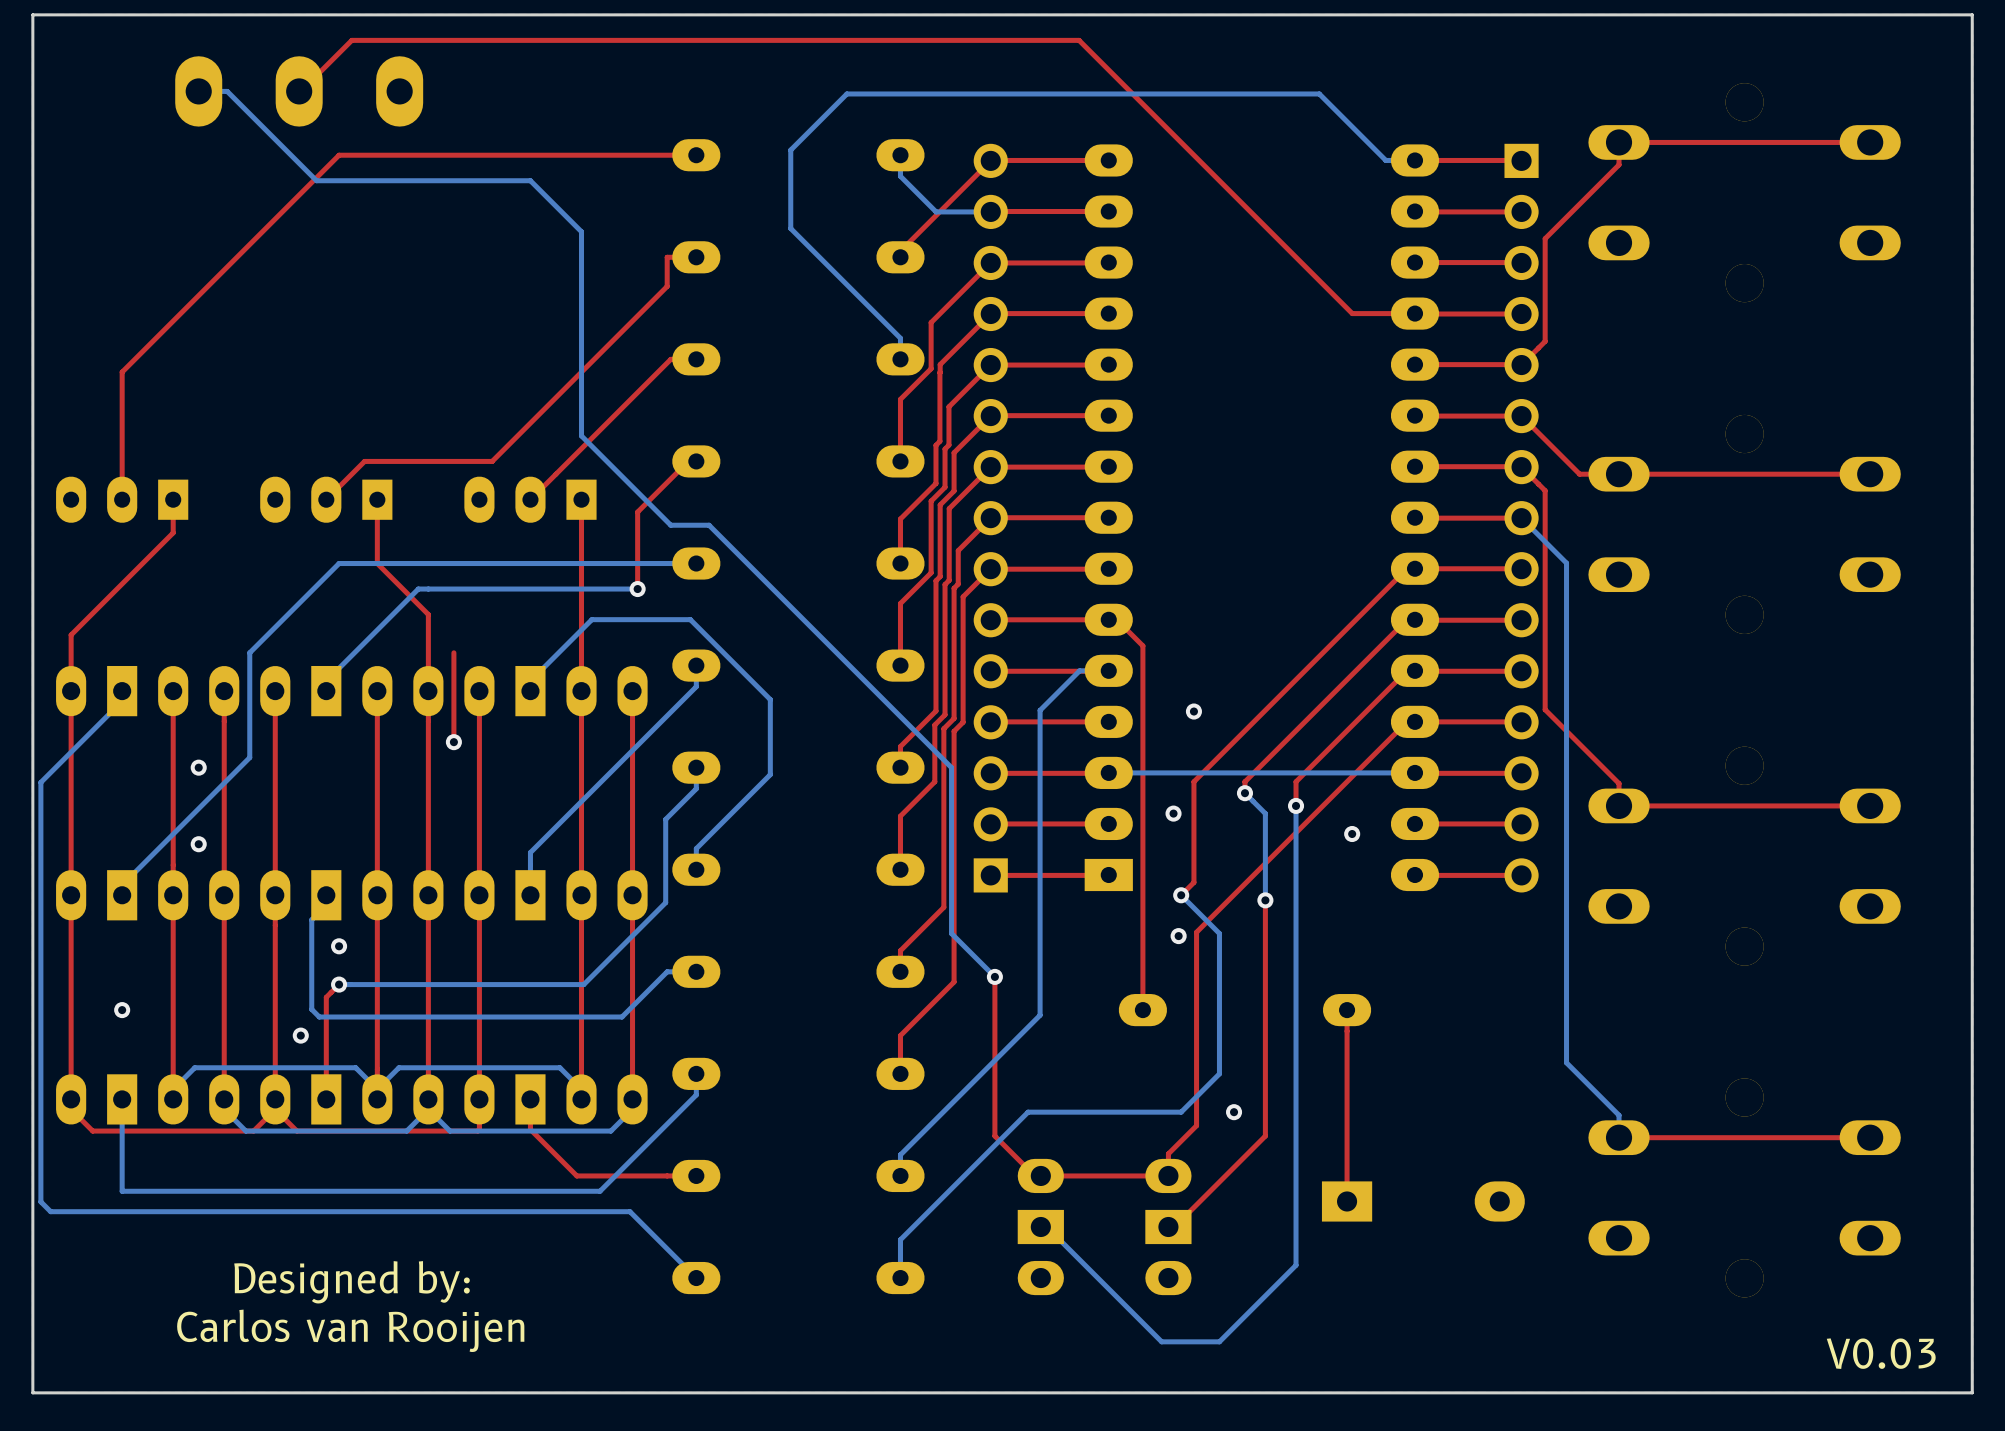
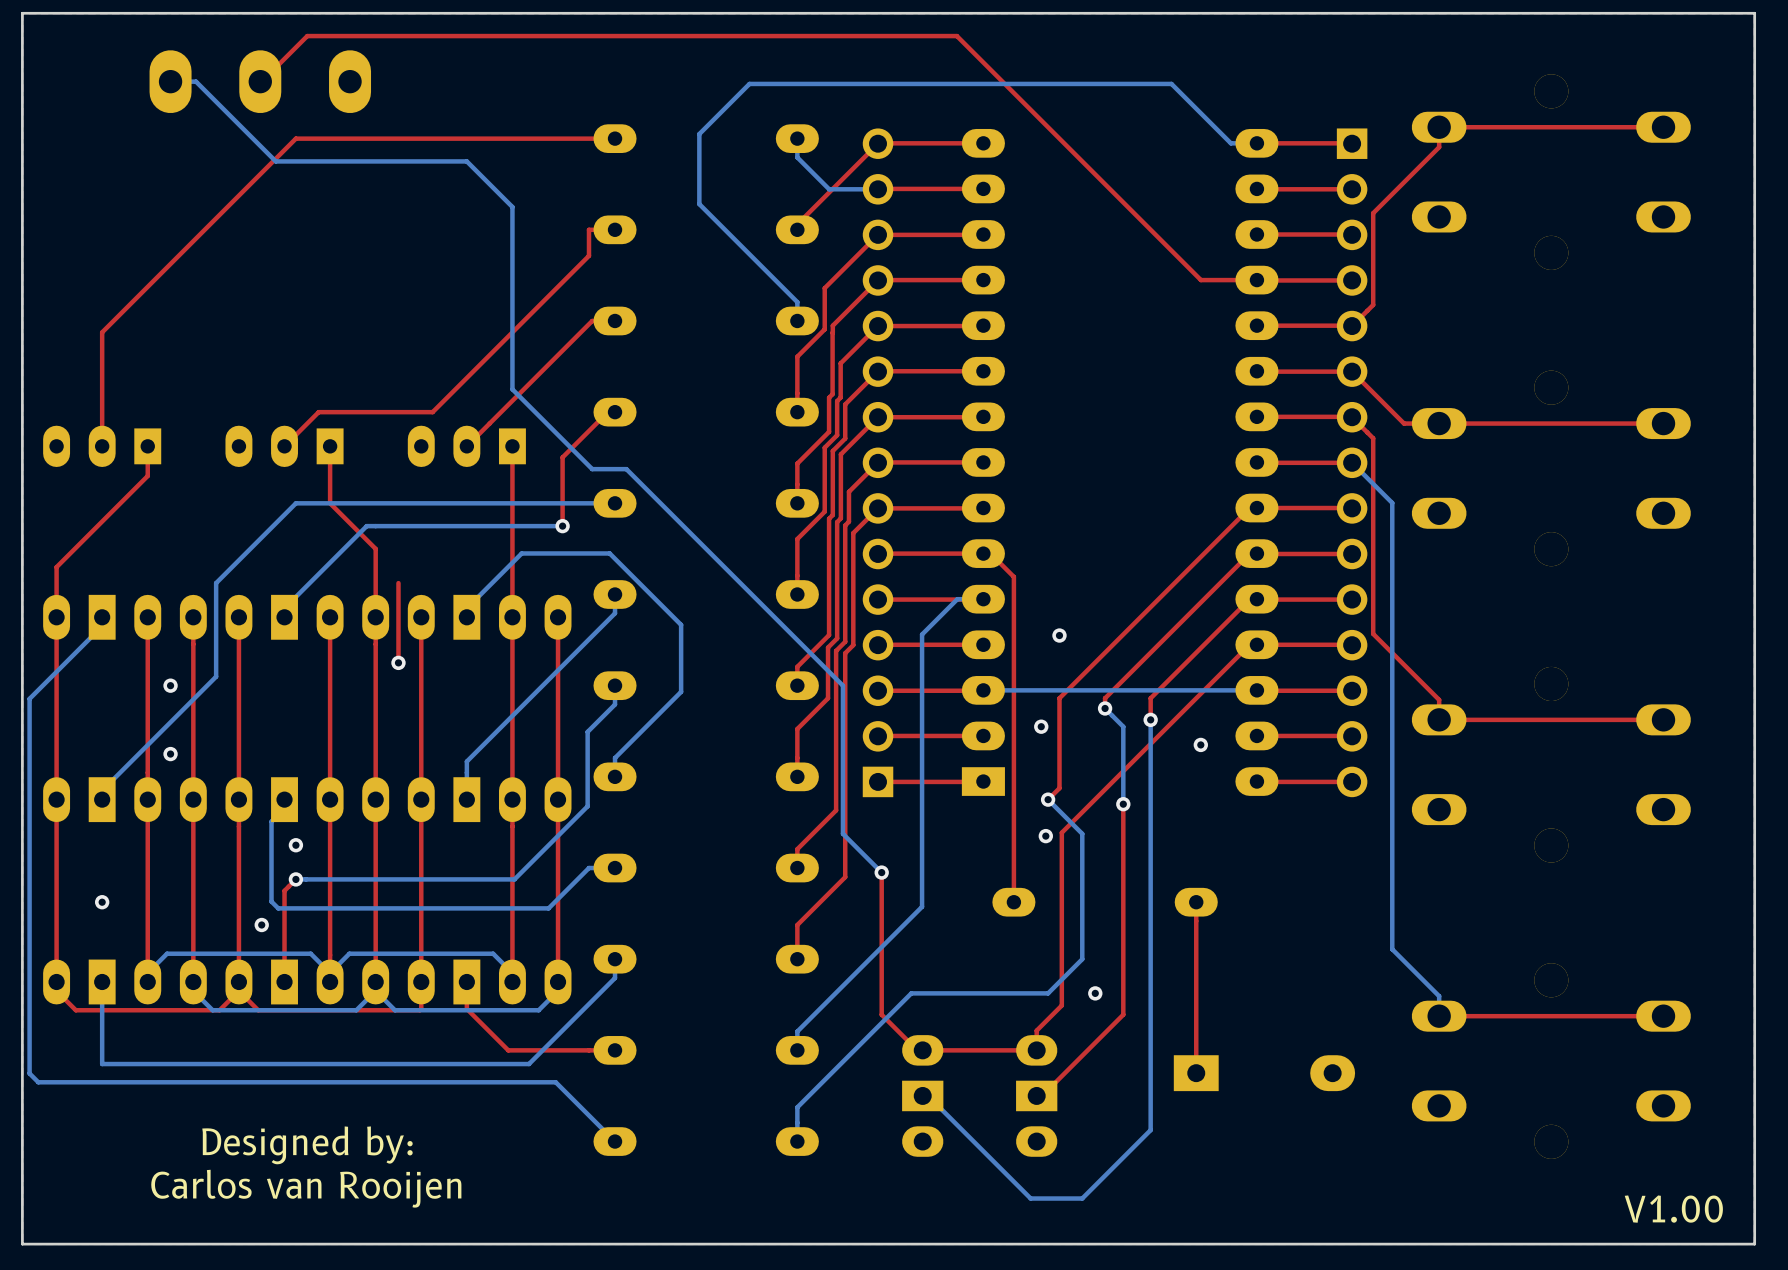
text: V0.03 (1881, 1353) -> V1.00 (1673, 1209)

